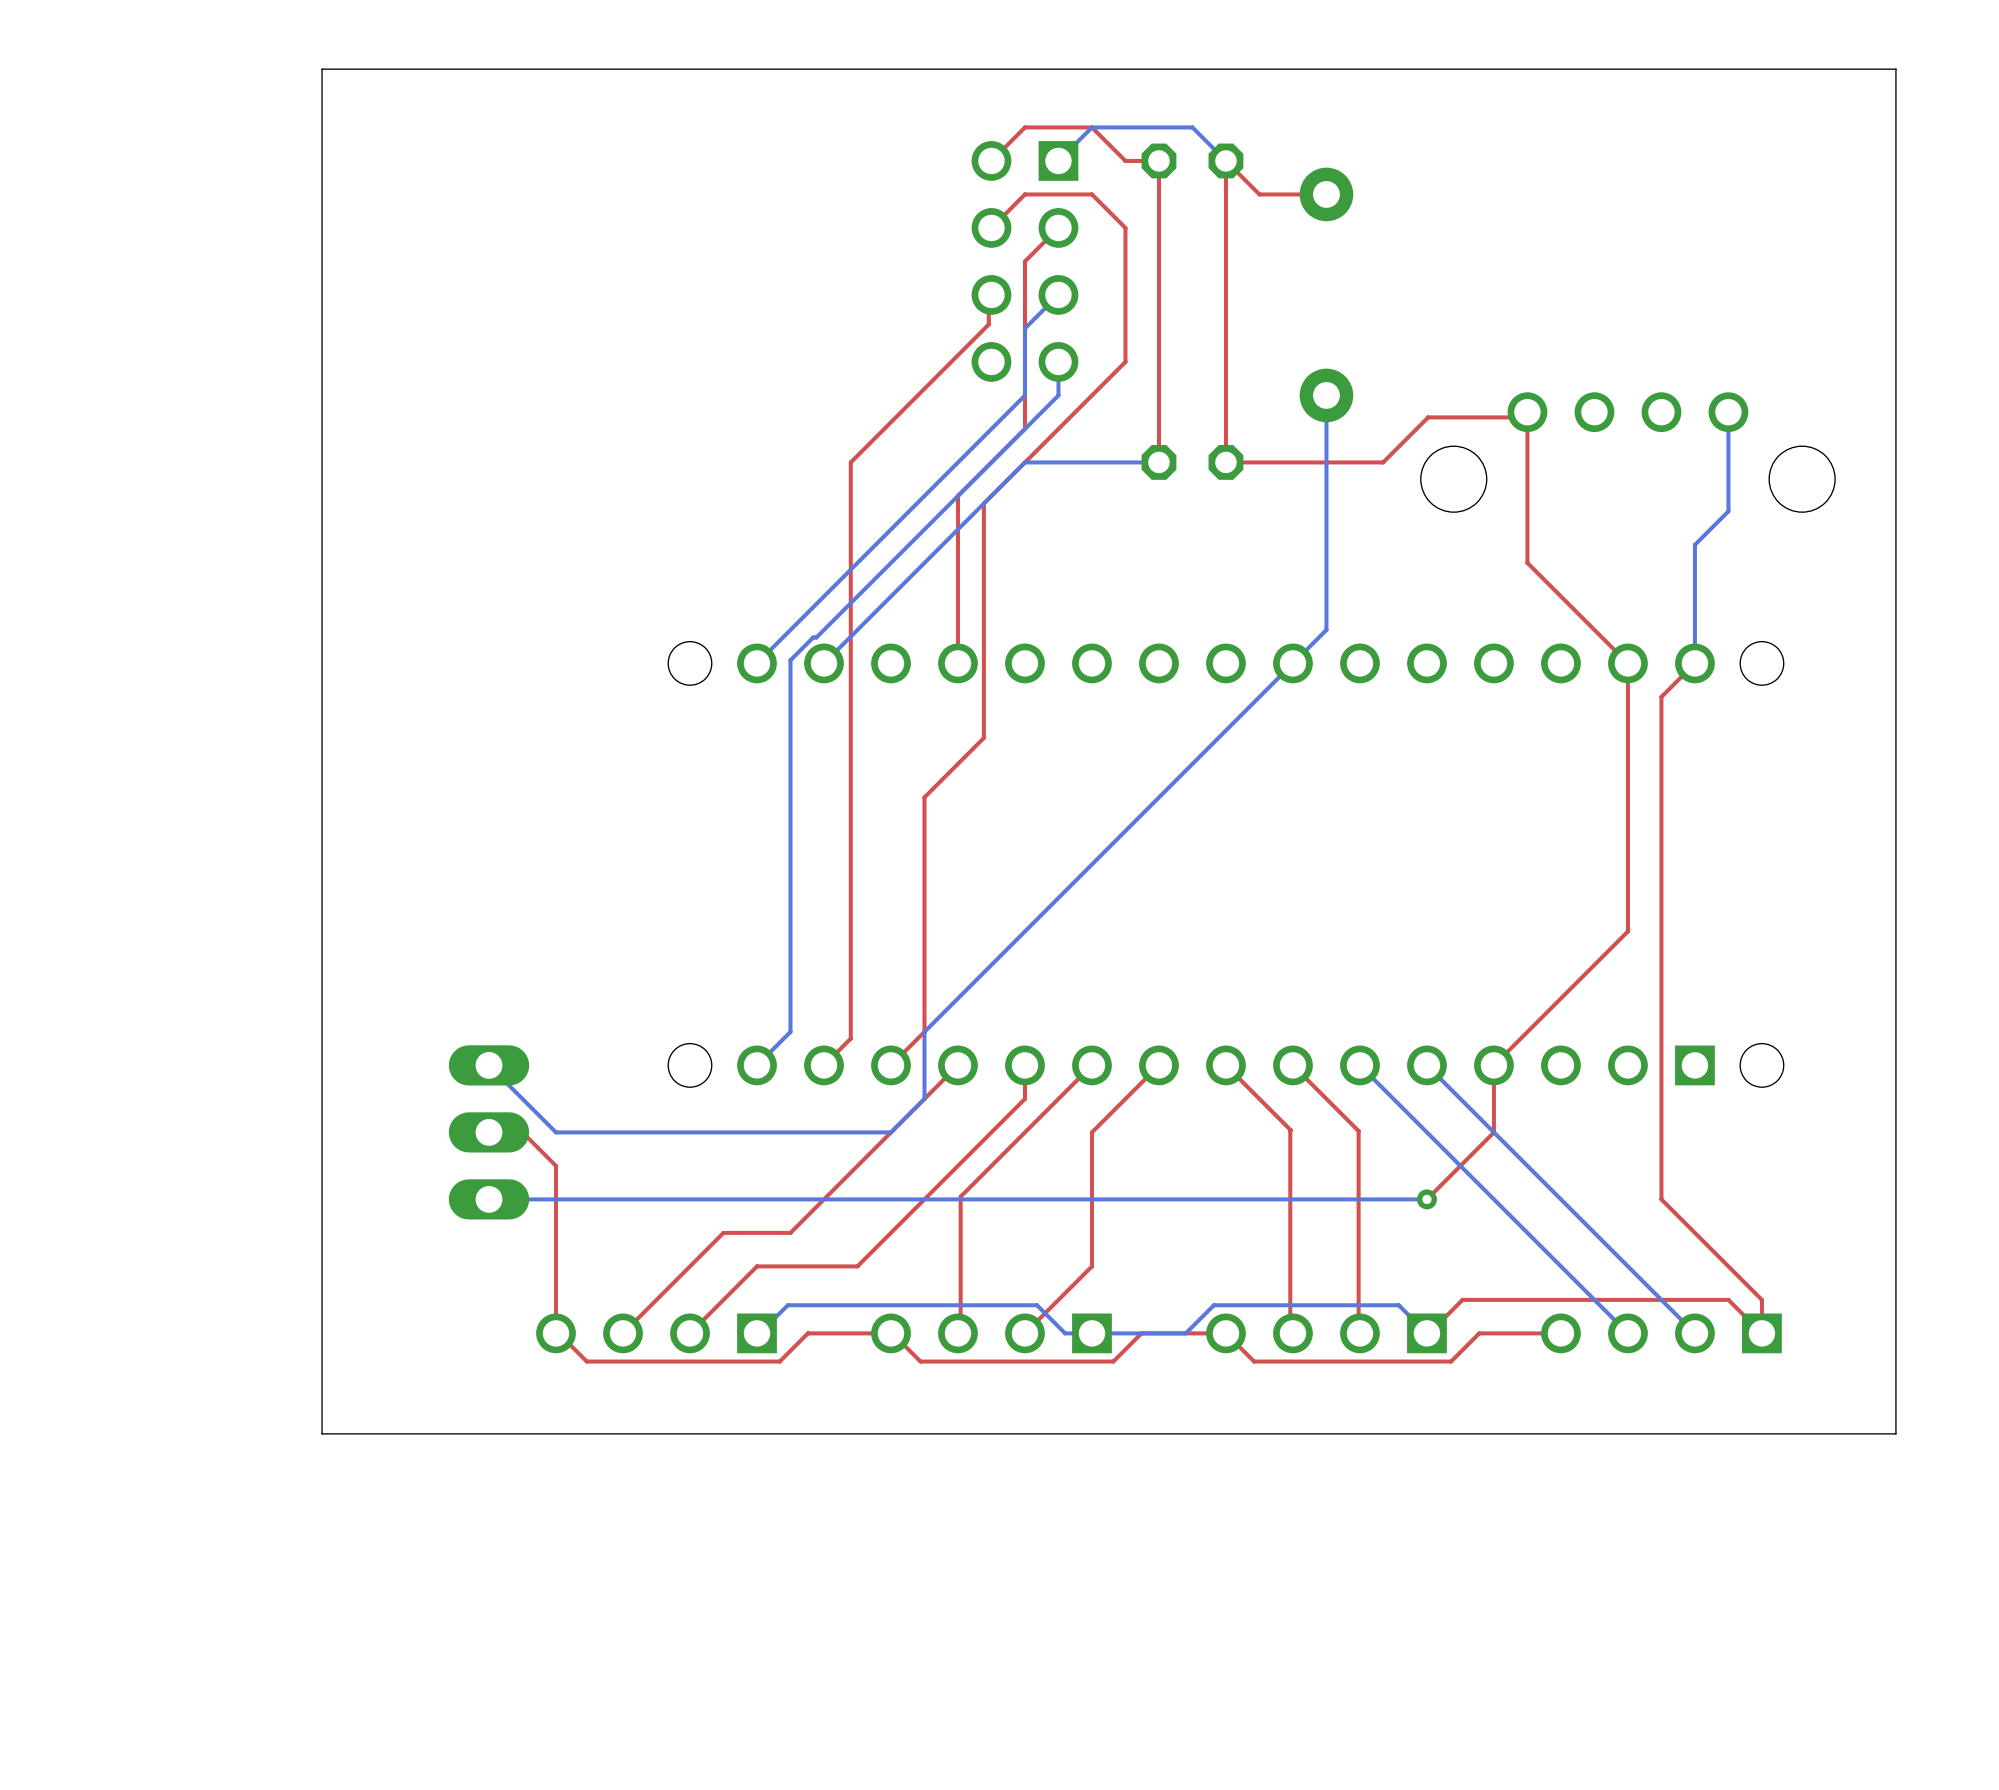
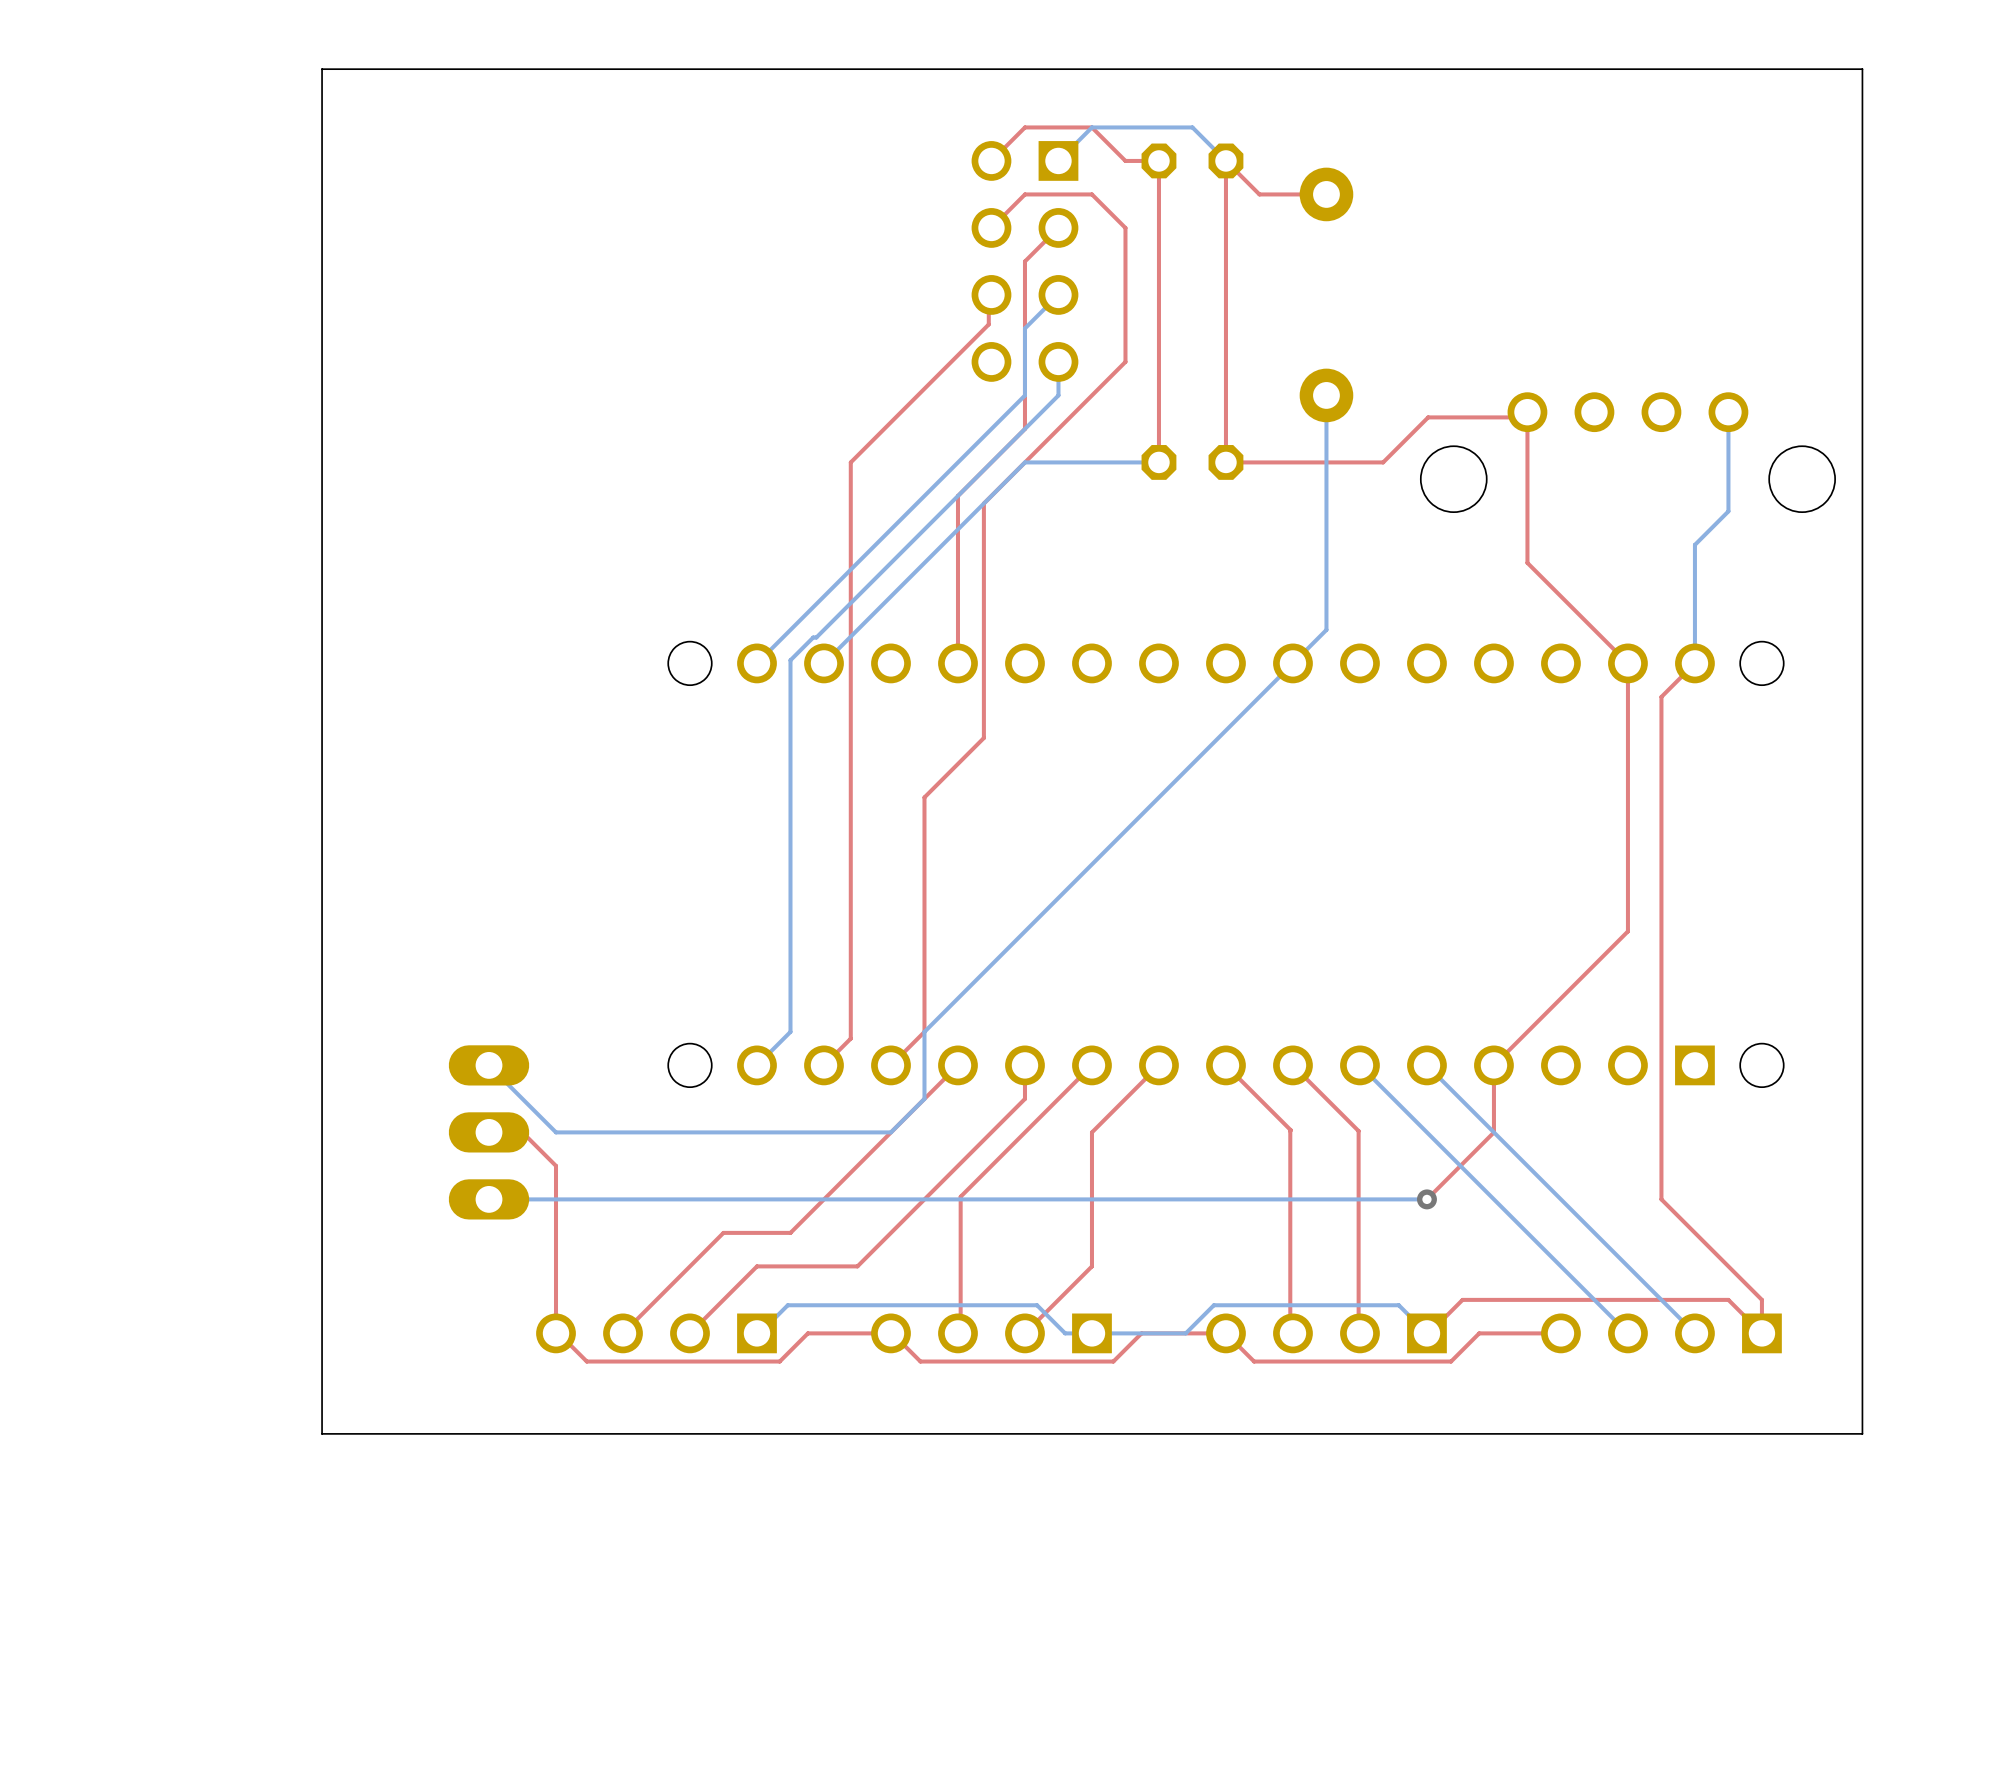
board edge: (1862, 69) (1895, 69) (1895, 1433) (1862, 1433) -> (1862, 69) (1862, 1433)

